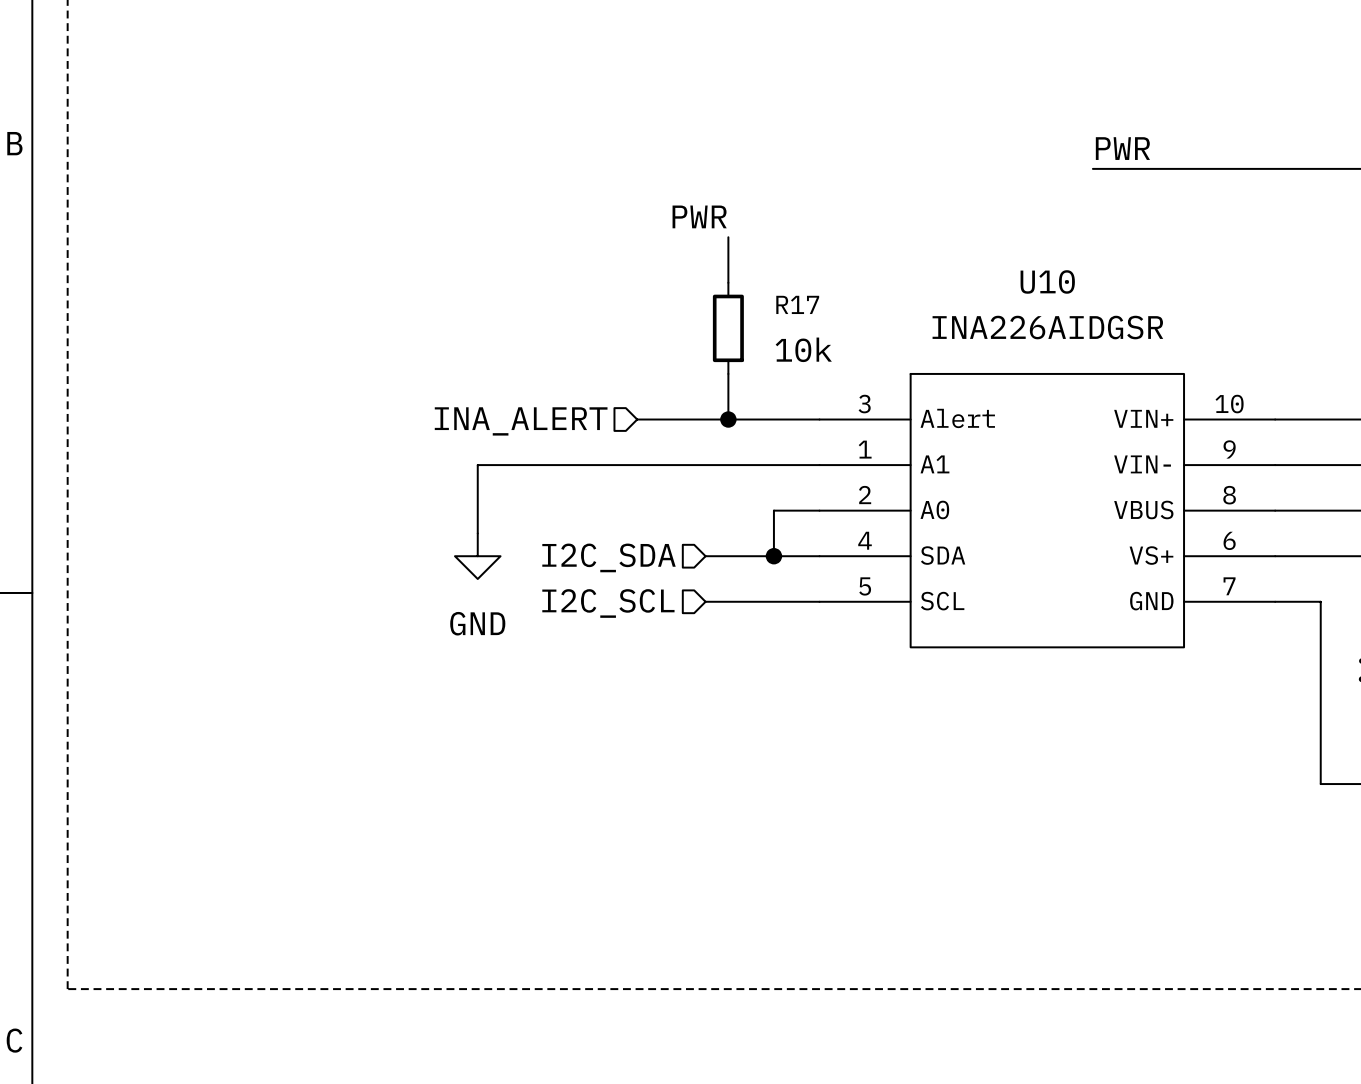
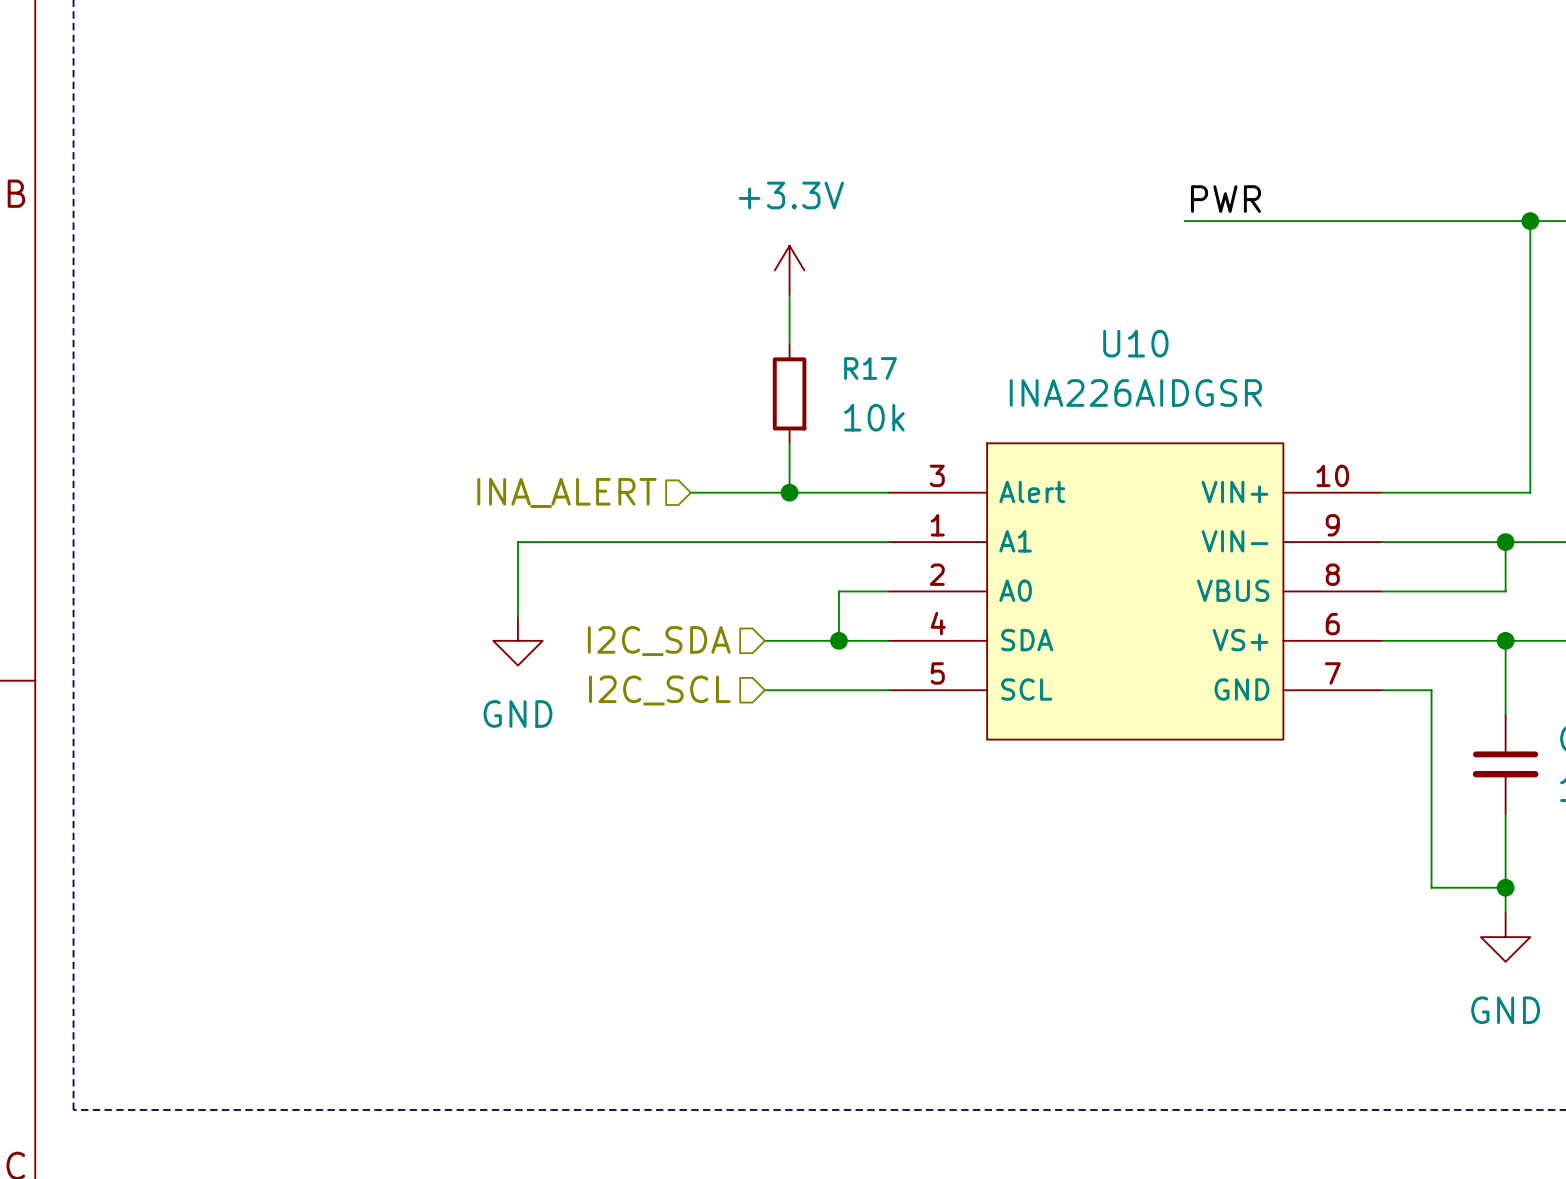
power symbol: none -> +3.3V (789, 270)
label: PWR (699, 216) -> none

